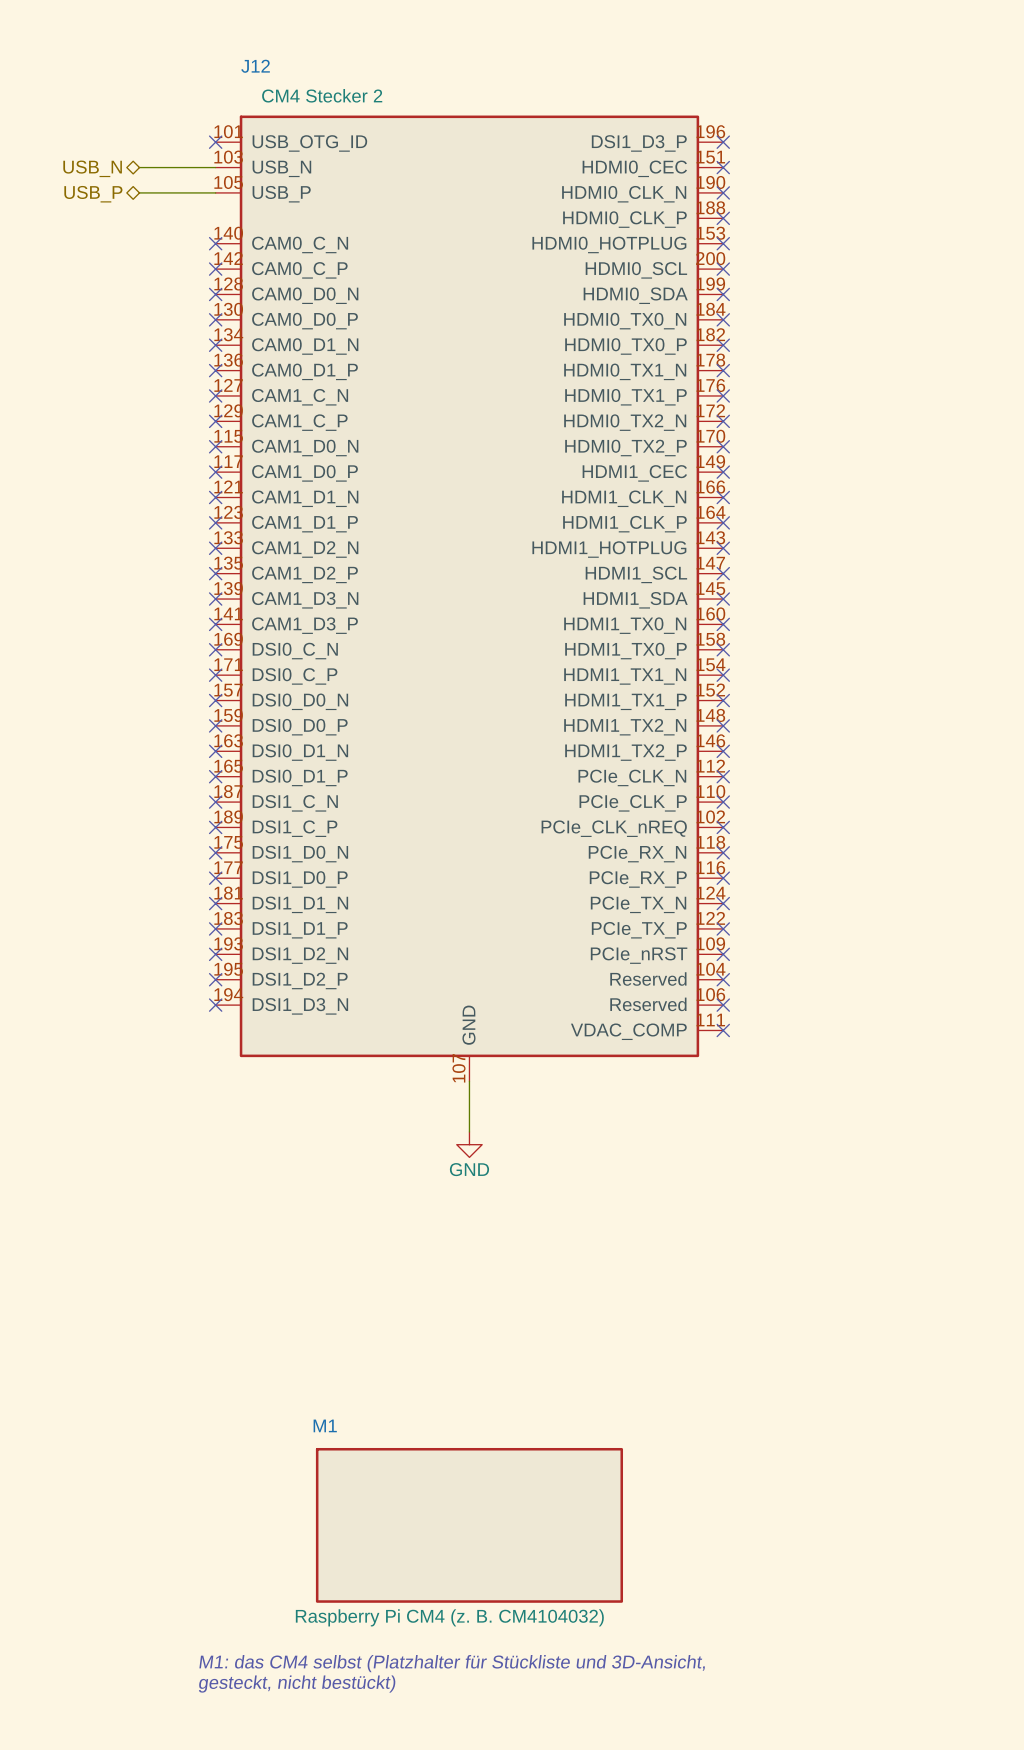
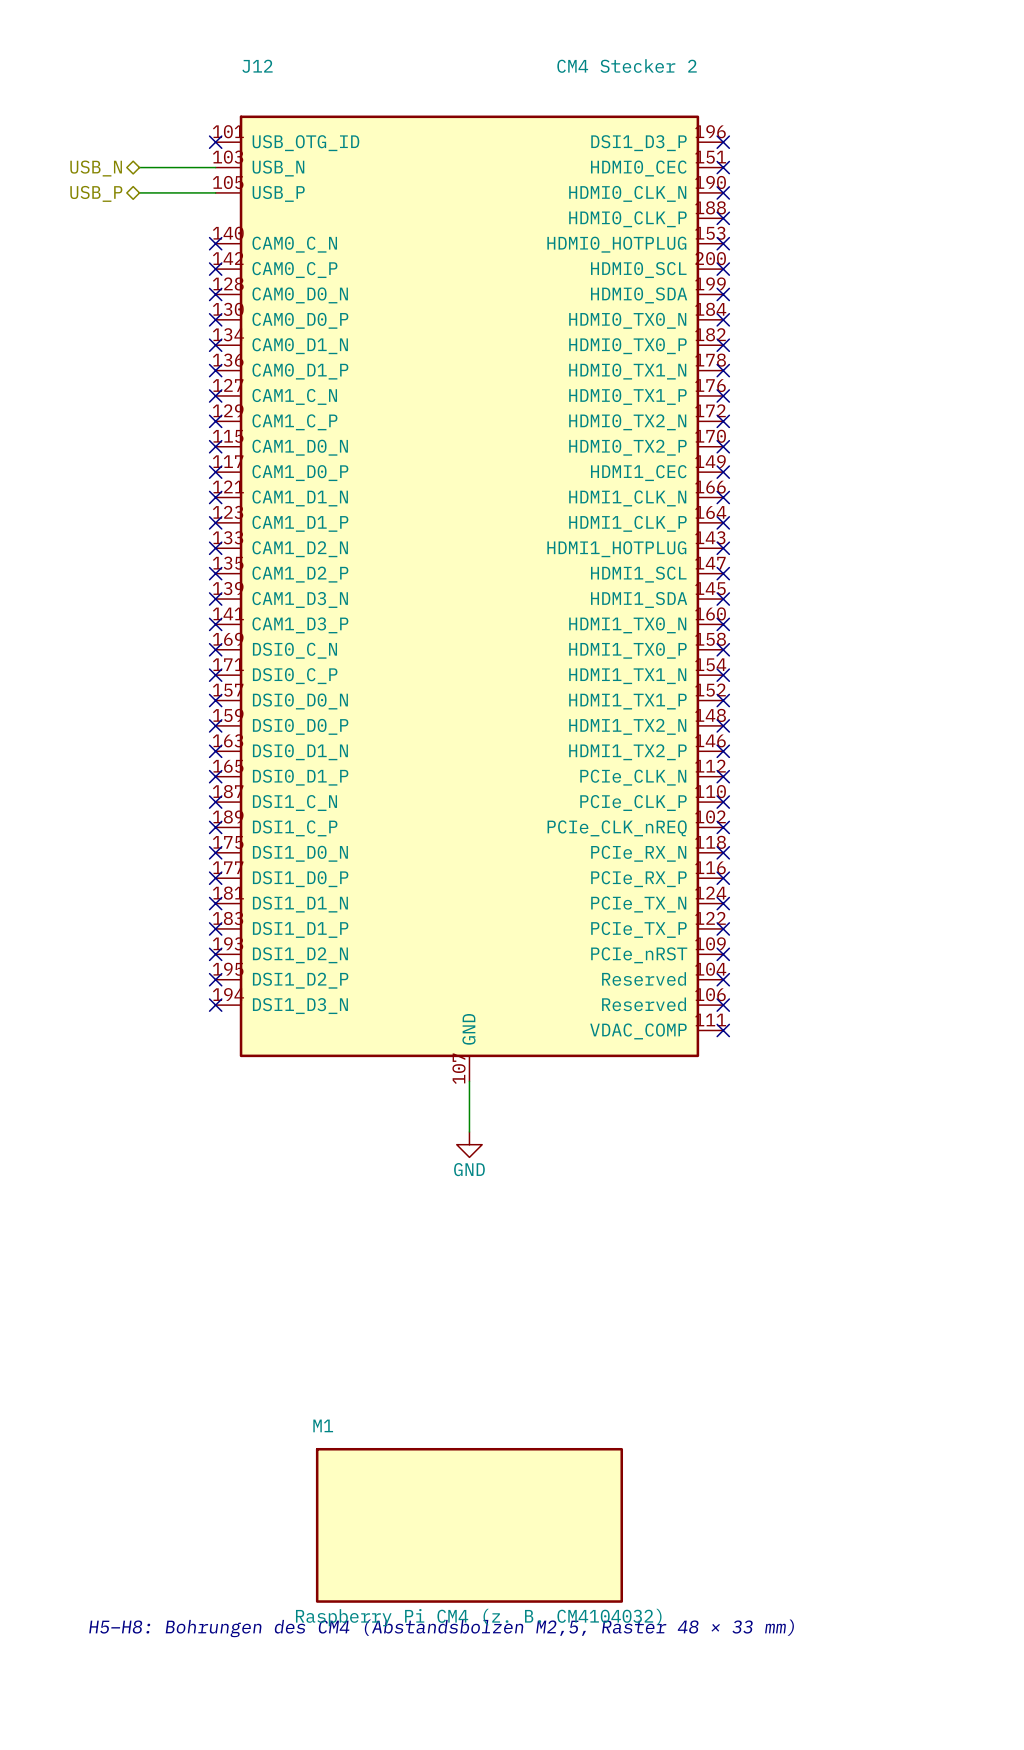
J12 value position: CM4 Stecker 2 (322, 95) -> CM4 Stecker 2 (627, 66)
text: none -> H5–H8: Bohrungen des CM4 (Abstandsbolzen M2,5, Raster 48 × 33 mm) (441, 1628)
text: M1: das CM4 selbst (Platzhalter für Stückliste und 3D-Ansicht, (452, 1663) -> none
text: gesteckt, nicht bestückt) (297, 1684) -> none

